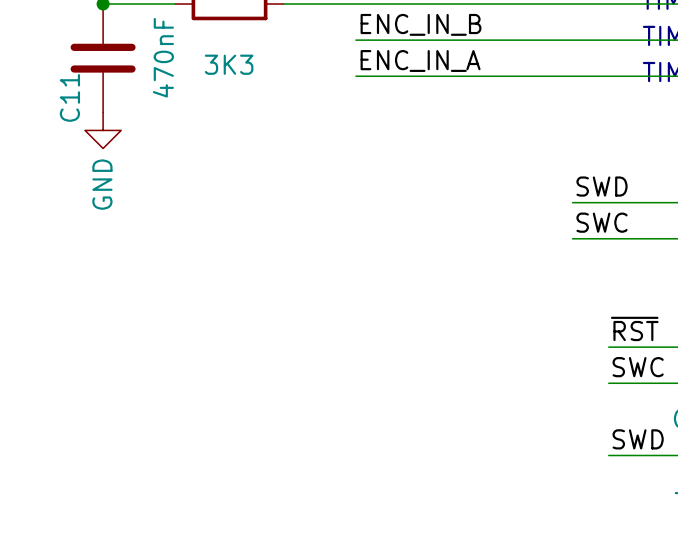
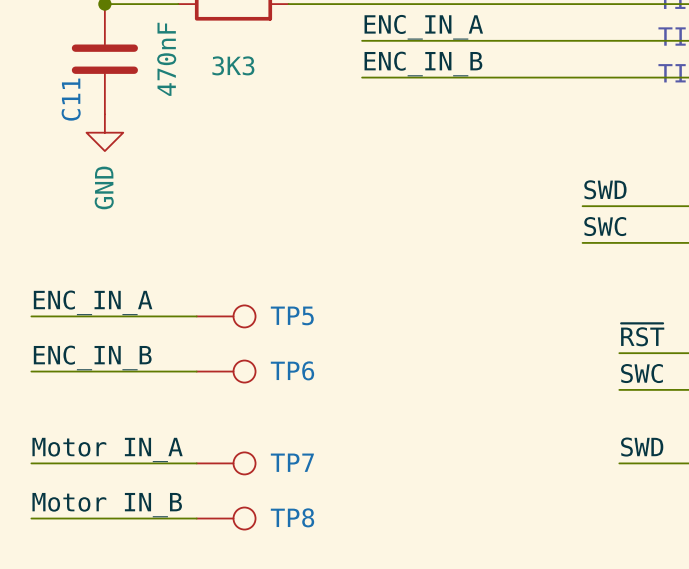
label: ENC_IN_B (420, 24) -> ENC_IN_A (423, 27)
label: ENC_IN_A (420, 60) -> ENC_IN_B (423, 63)
label: none -> ENC_IN_A (93, 302)
wire: none -> (31, 316) (196, 316)
TP5: none -> (226, 316)
label: none -> ENC_IN_B (92, 357)
wire: none -> (31, 371) (196, 371)
TP6: none -> (226, 371)
label: none -> Motor IN_A (107, 449)
wire: none -> (31, 463) (196, 463)
TP7: none -> (226, 463)
label: none -> Motor IN_B (107, 505)
wire: none -> (31, 518) (196, 518)
TP8: none -> (226, 518)

